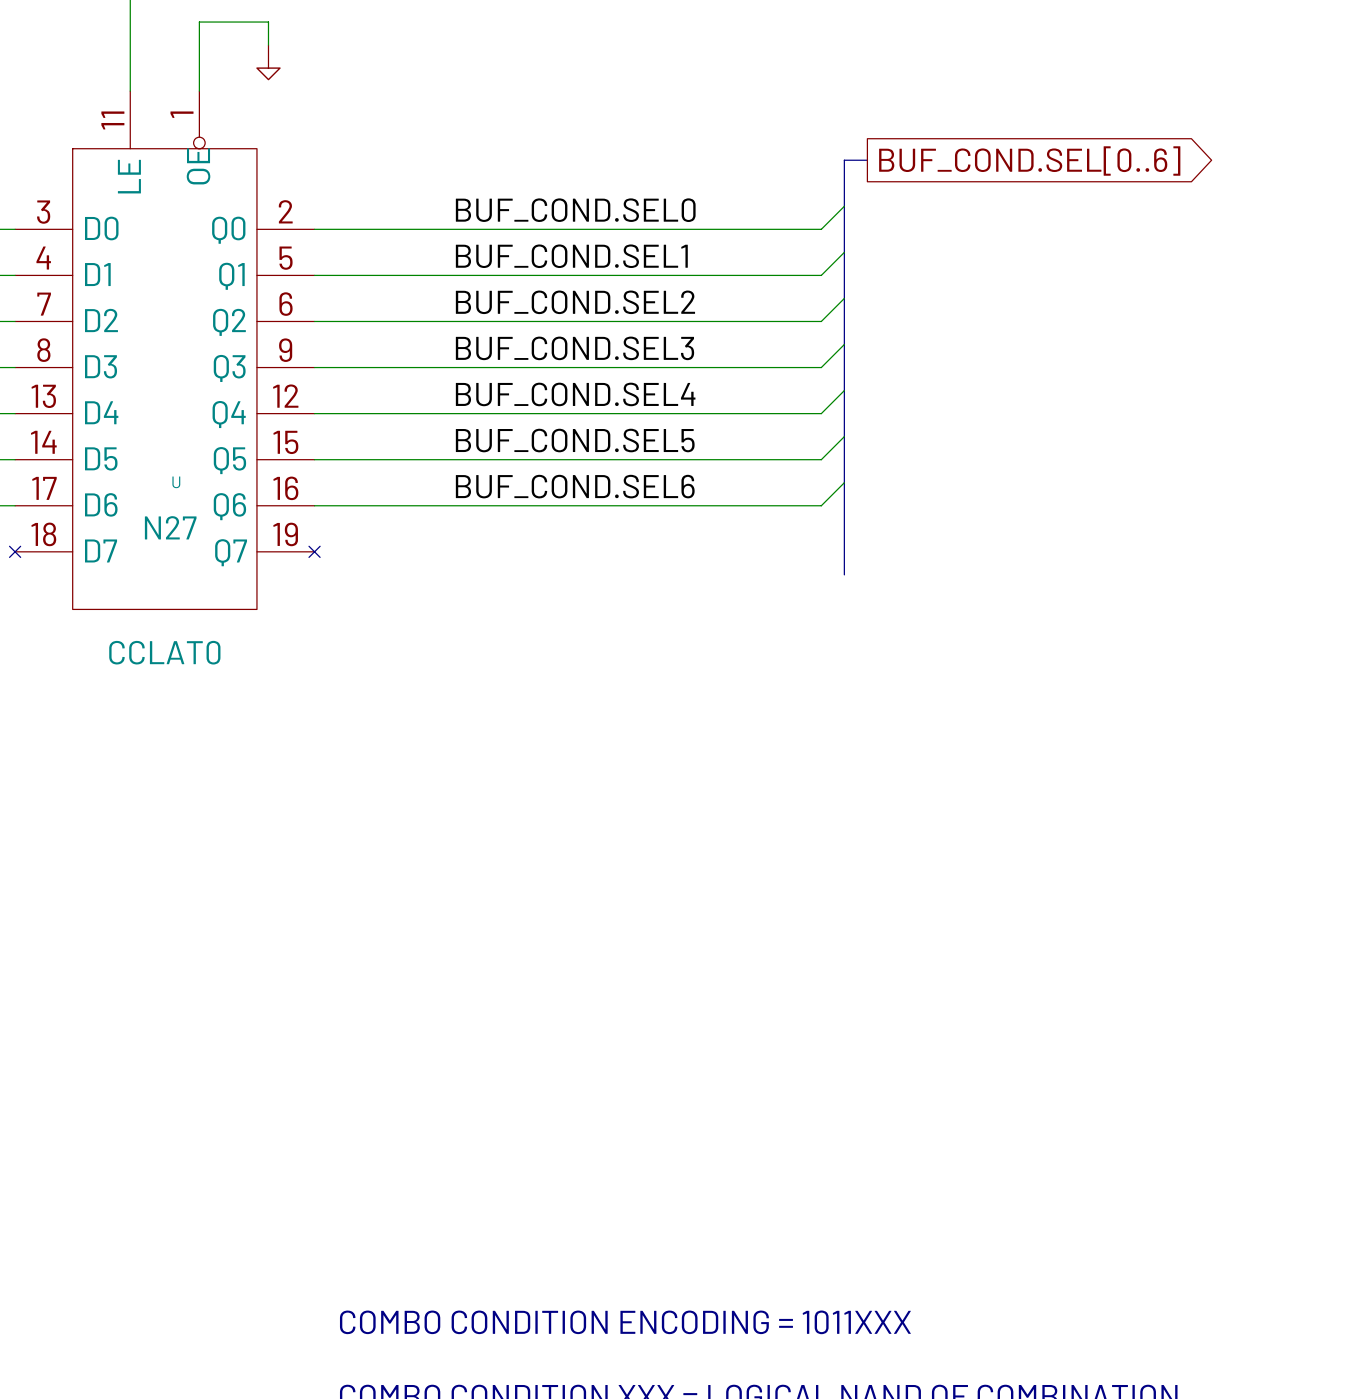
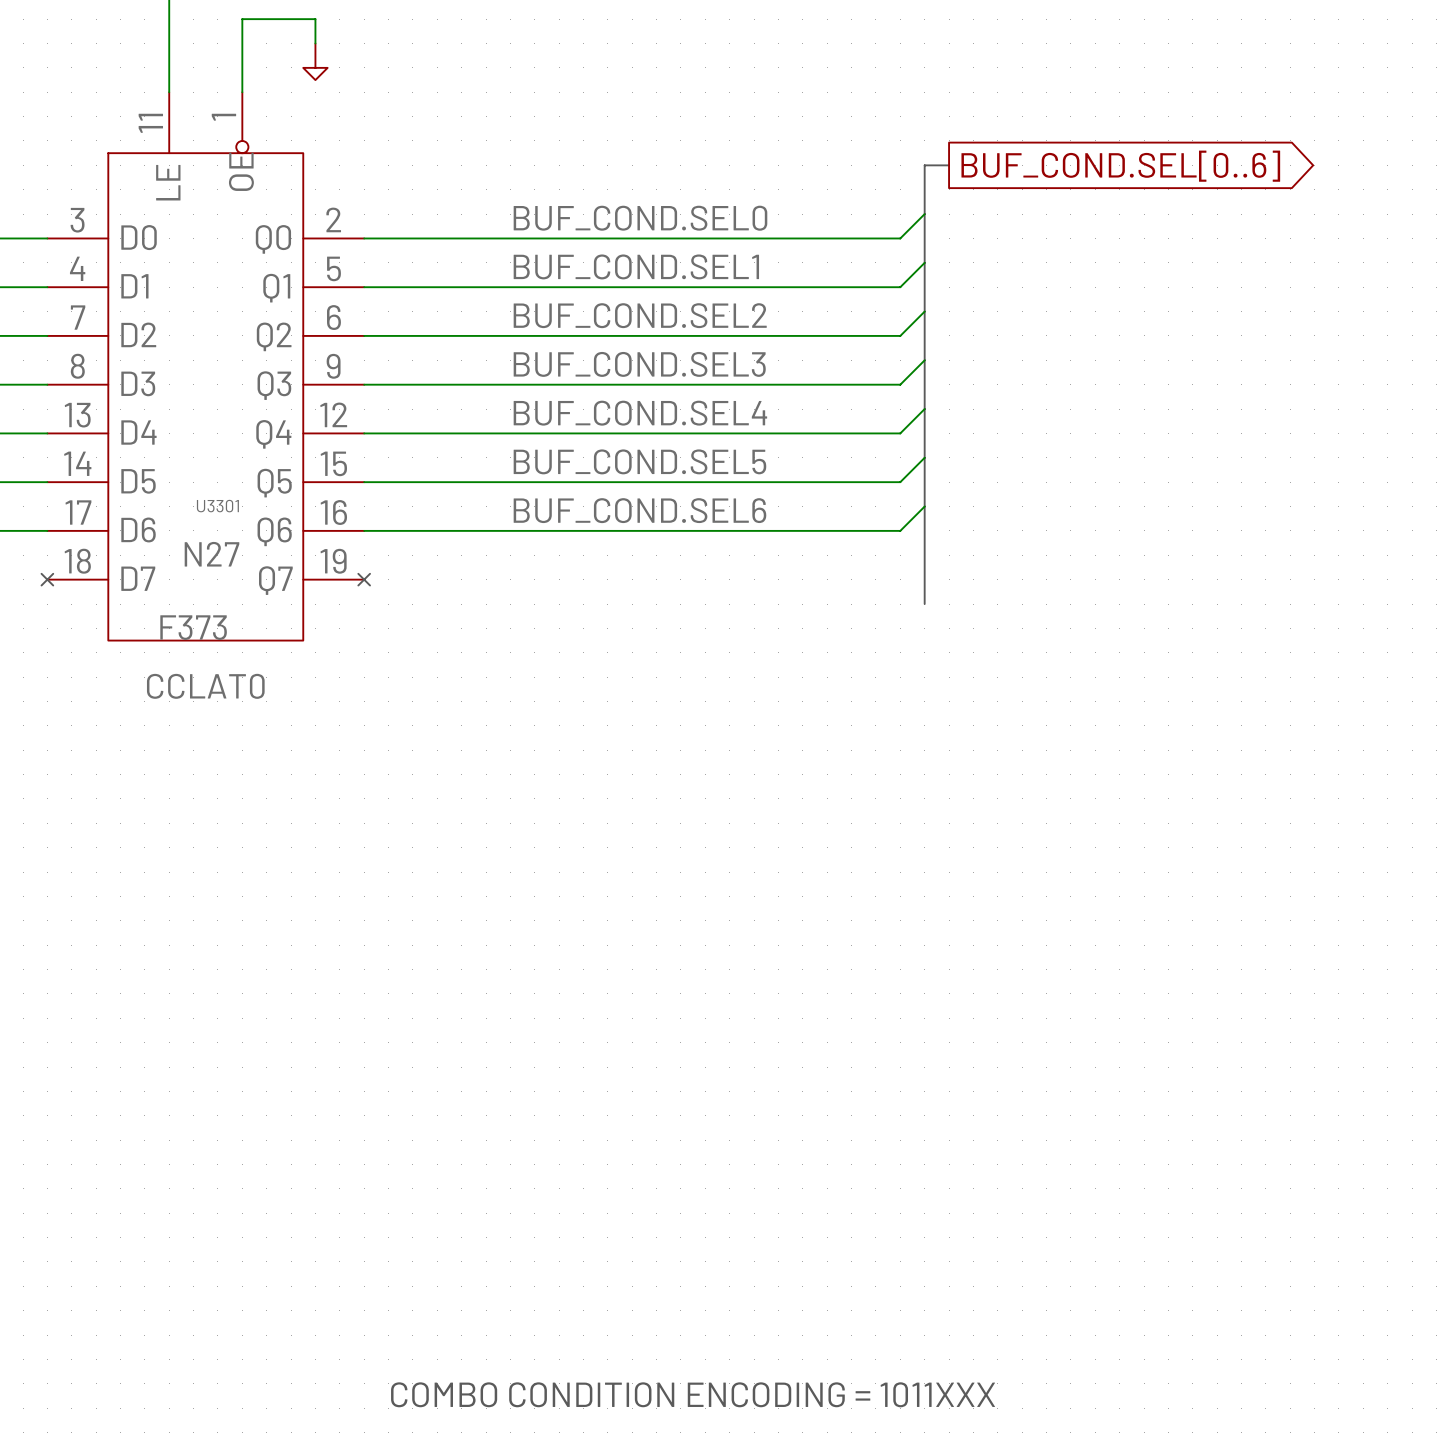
U name: U (176, 482) -> U3301 (217, 506)
U value: none -> F373 (193, 627)

